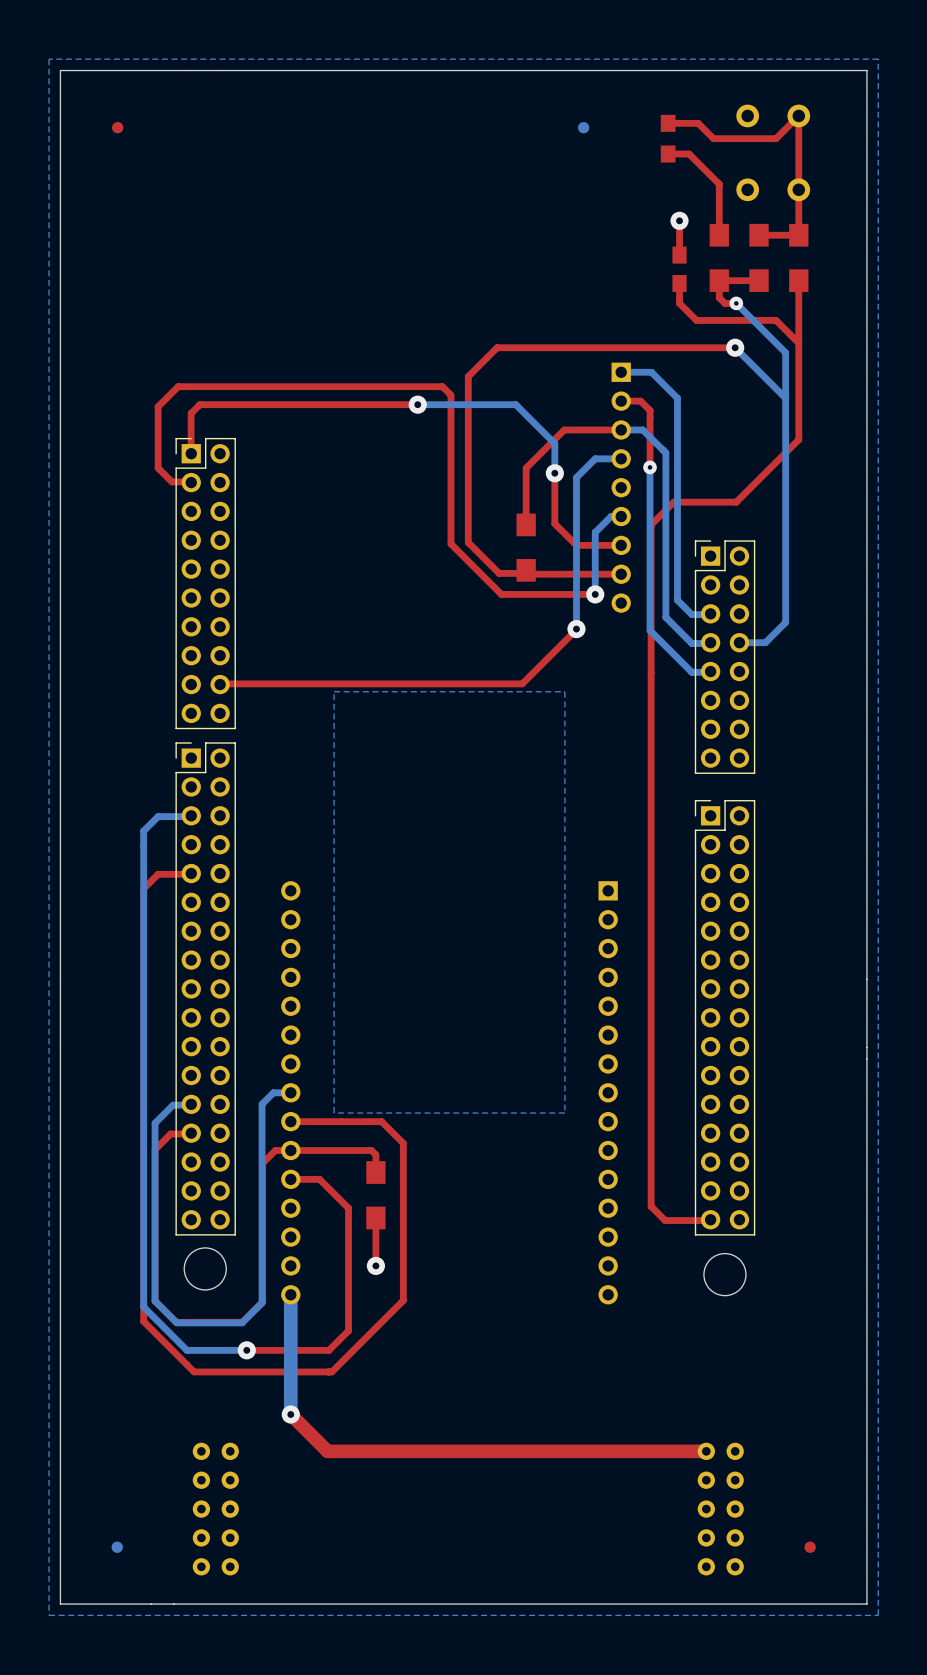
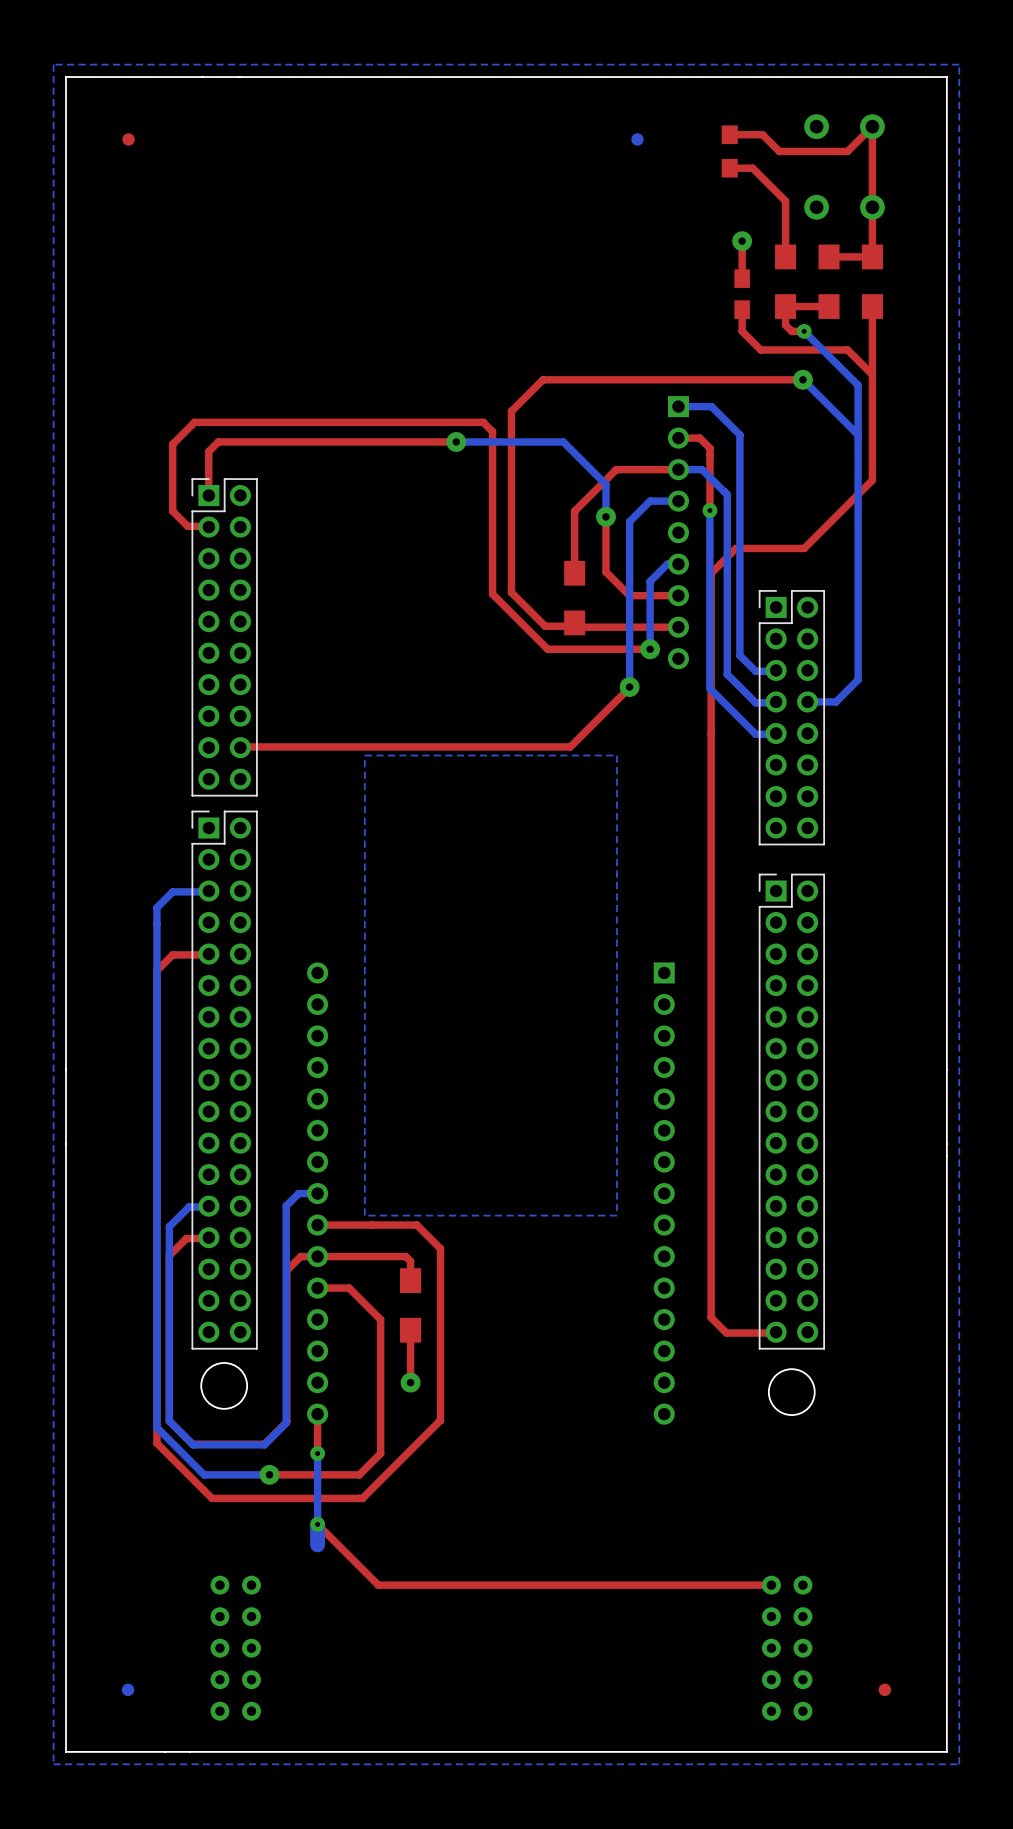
bottom track: (290, 1294) (290, 1330) -> none
top track: none -> (317, 1414) (317, 1453)
bottom track width: thick (290, 1330) (290, 1395) -> thin (317, 1453) (317, 1524)
via: none -> (317, 1453)
via: none -> (317, 1524)
top track: (290, 1414) (327, 1451) (346, 1451) -> (317, 1524) (378, 1585)
via: (290, 1414) -> none
top track width: thick (706, 1451) (346, 1451) -> thin (771, 1585) (378, 1585)

